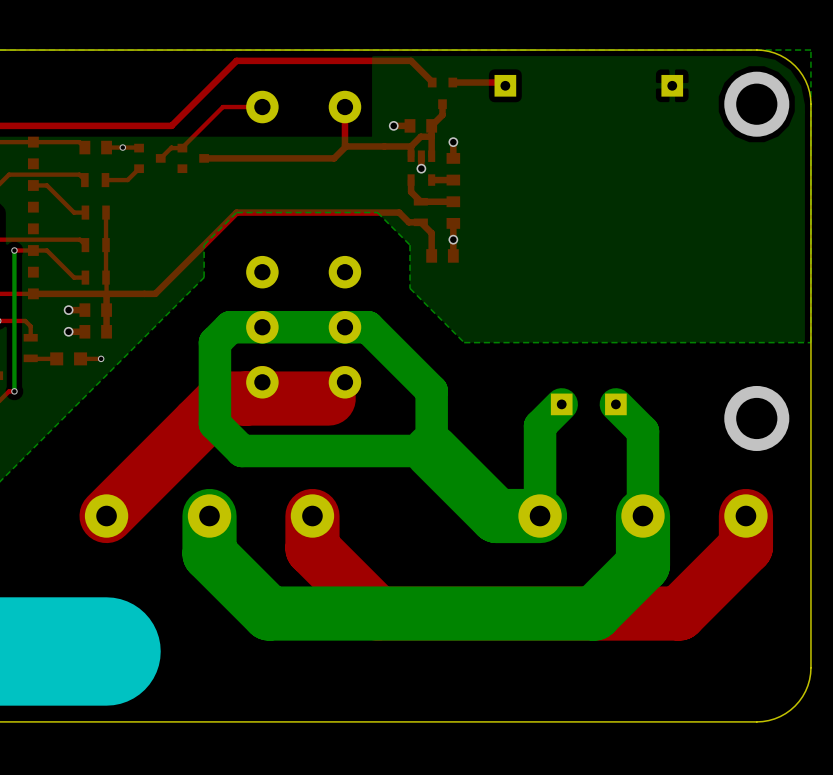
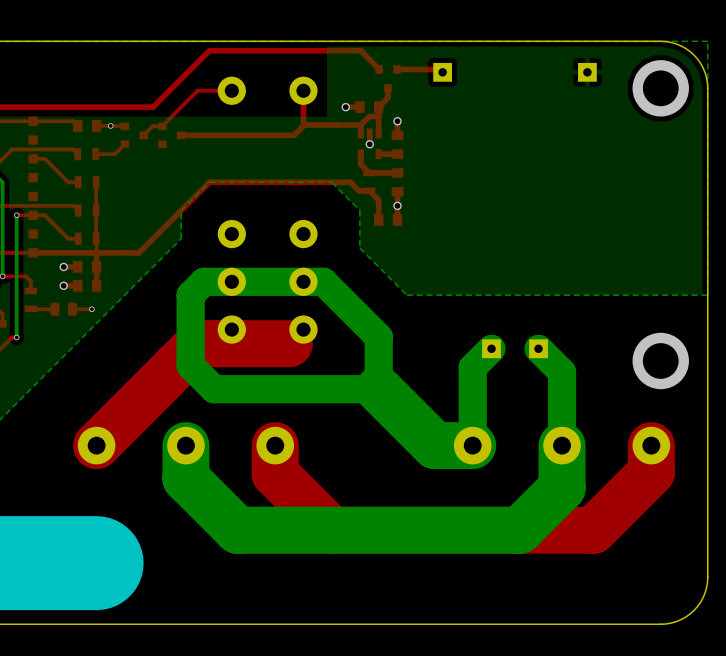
part footprint: [50, 352, 88, 366] -> [50, 302, 78, 316]

